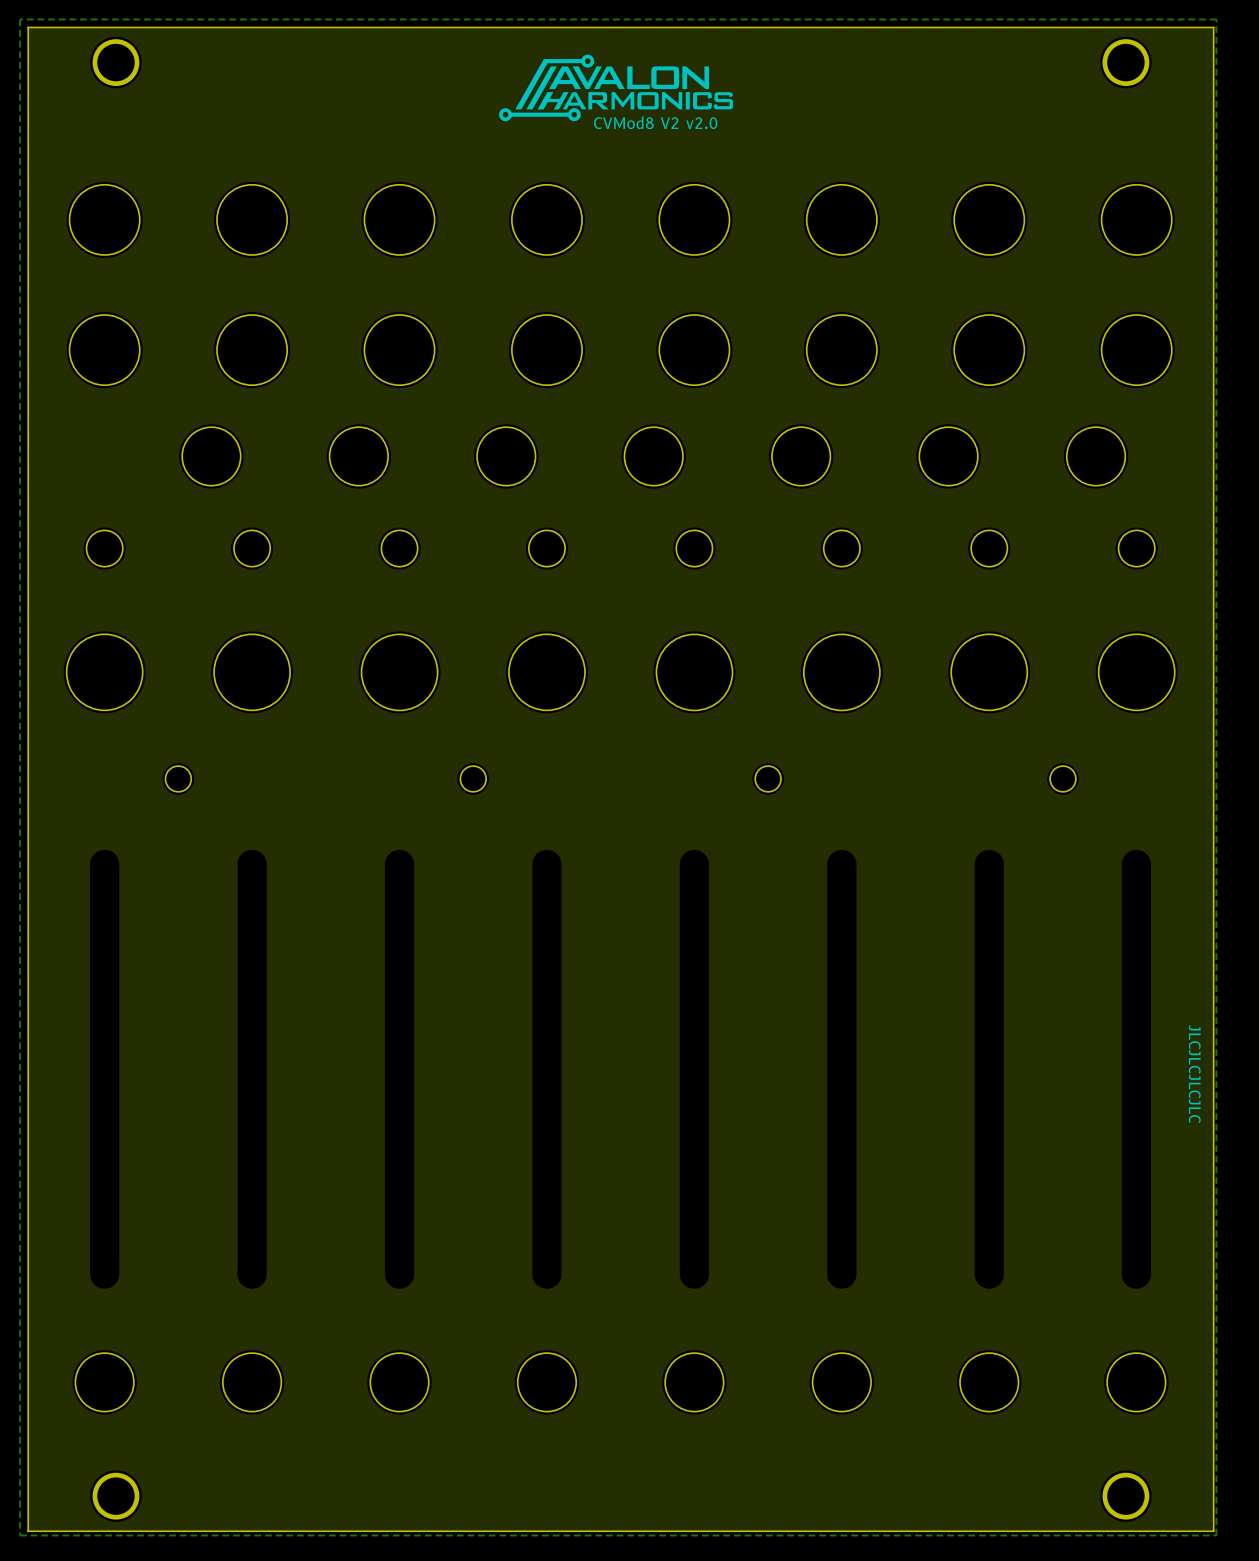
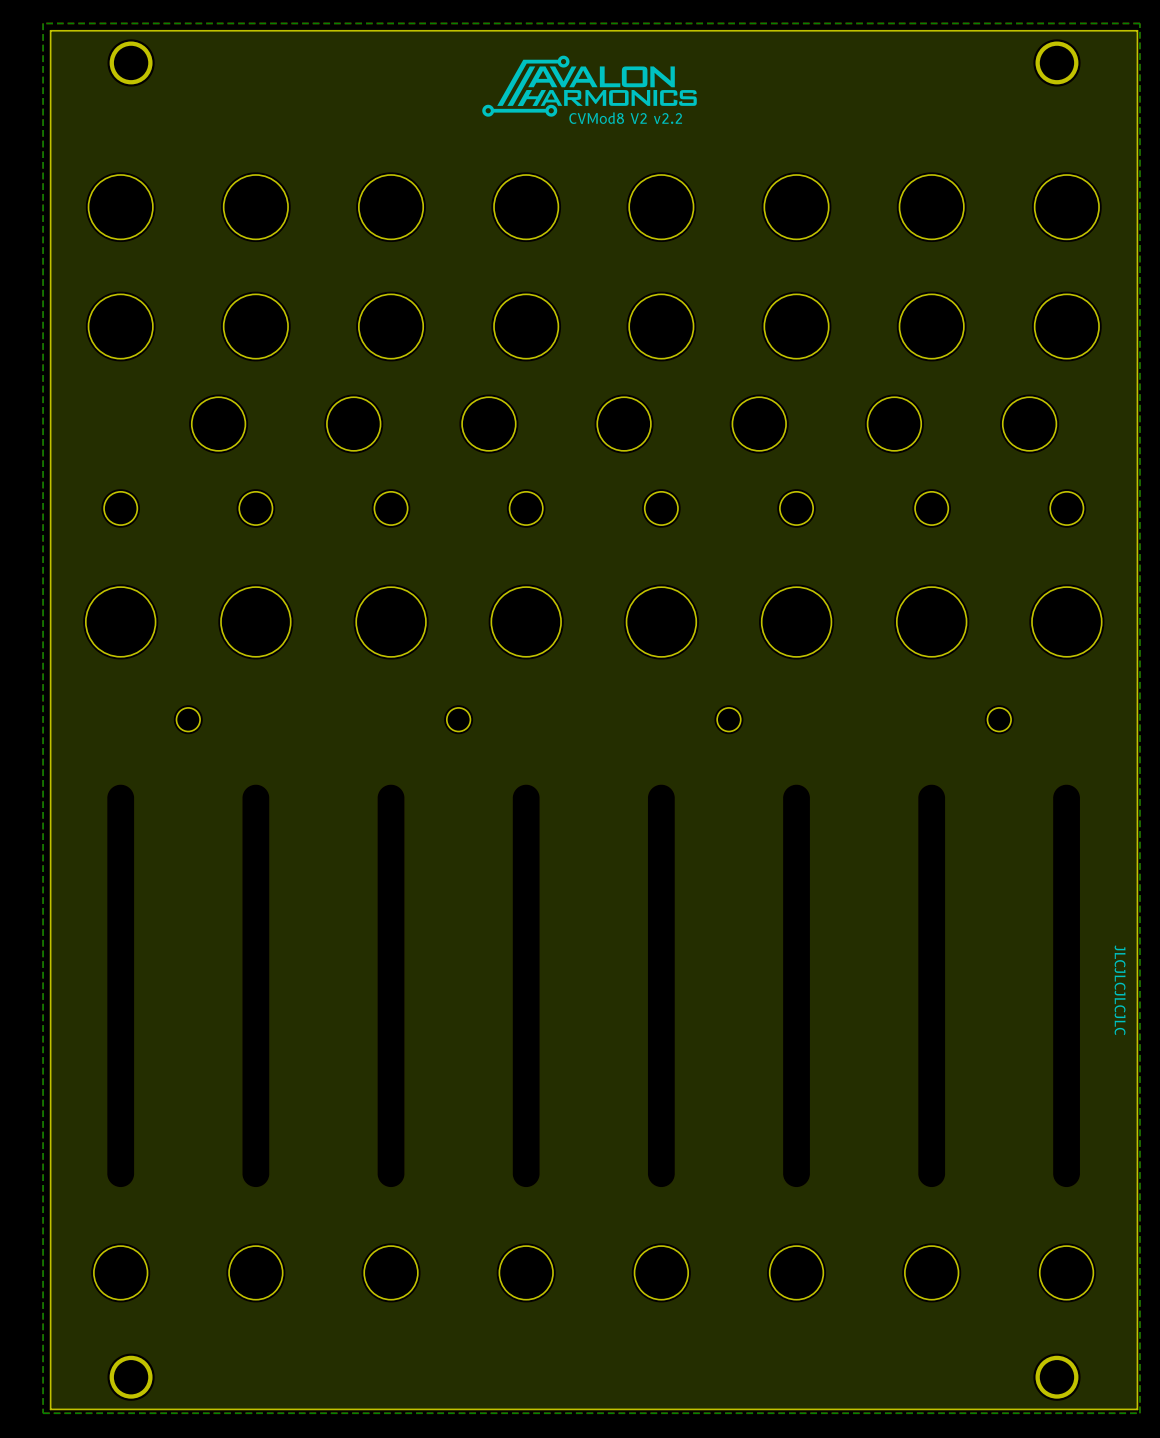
text: CVMod8 V2 v2.0 (655, 122) -> CVMod8 V2 v2.2 (625, 118)

